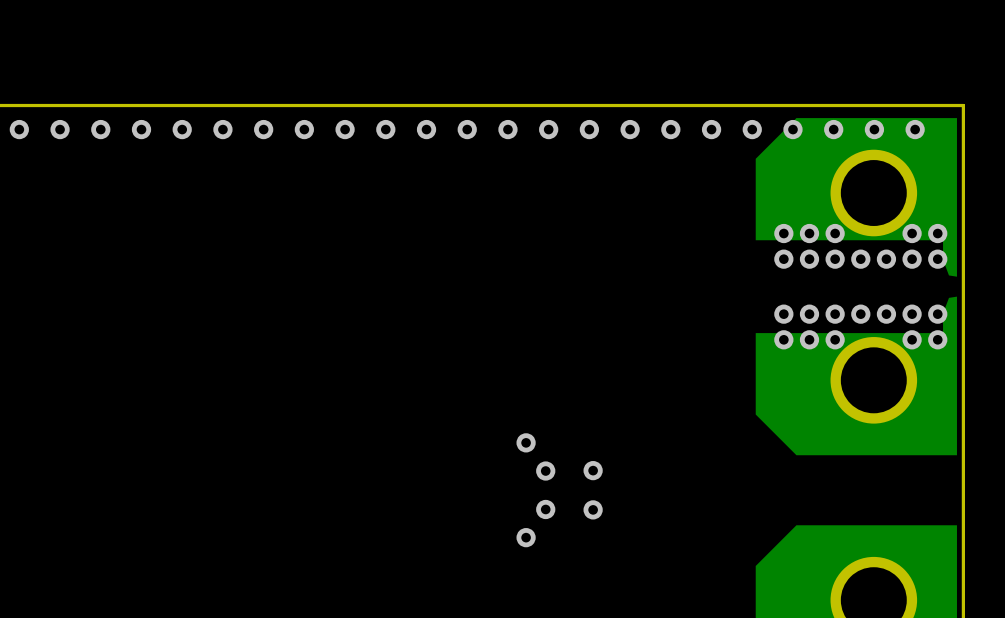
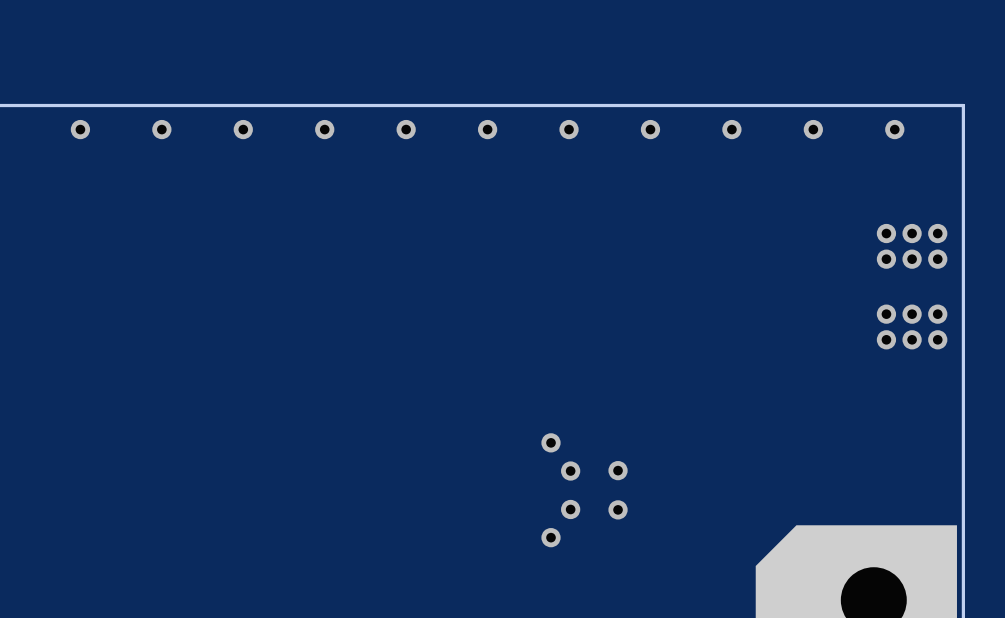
via: (19, 129) -> none
via: (60, 129) -> none
via: none -> (80, 129)
via: (100, 129) -> none
via: (141, 129) -> none
via: none -> (161, 129)
via: (182, 129) -> none
via: (222, 129) -> none
via: none -> (243, 129)
via: (263, 129) -> none
via: (304, 129) -> none
via: none -> (324, 129)
via: (345, 129) -> none
via: (385, 129) -> none
via: none -> (406, 129)
via: (426, 129) -> none
via: (467, 129) -> none
via: none -> (487, 129)
via: (507, 129) -> none
via: (548, 129) -> none
via: none -> (569, 129)
via: (589, 129) -> none
via: (630, 129) -> none
via: none -> (650, 129)
via: (670, 129) -> none
via: (711, 129) -> none
via: none -> (731, 129)
via: (752, 129) -> none
via: (792, 129) -> none
via: none -> (813, 129)
via: (833, 129) -> none
via: (874, 129) -> none
via: none -> (894, 129)
via: (915, 129) -> none
via: (783, 233) -> none
via: (809, 233) -> none
via: (835, 233) -> none
via: none -> (886, 233)
via: (783, 259) -> none
via: (809, 259) -> none
via: (835, 259) -> none
via: (860, 259) -> none
part: (856, 286) -> none
via: (783, 314) -> none
via: (809, 314) -> none
via: (835, 314) -> none
via: (860, 314) -> none
via: (783, 339) -> none
via: (809, 339) -> none
via: (835, 339) -> none
via: none -> (886, 339)
via: (526, 442) -> none
via: none -> (551, 442)
via: (593, 470) -> none
via: none -> (618, 470)
via: (545, 471) -> none
via: none -> (570, 471)
via: (545, 509) -> none
via: none -> (570, 509)
via: (593, 509) -> none
via: none -> (618, 509)
via: (526, 537) -> none
via: none -> (551, 537)

